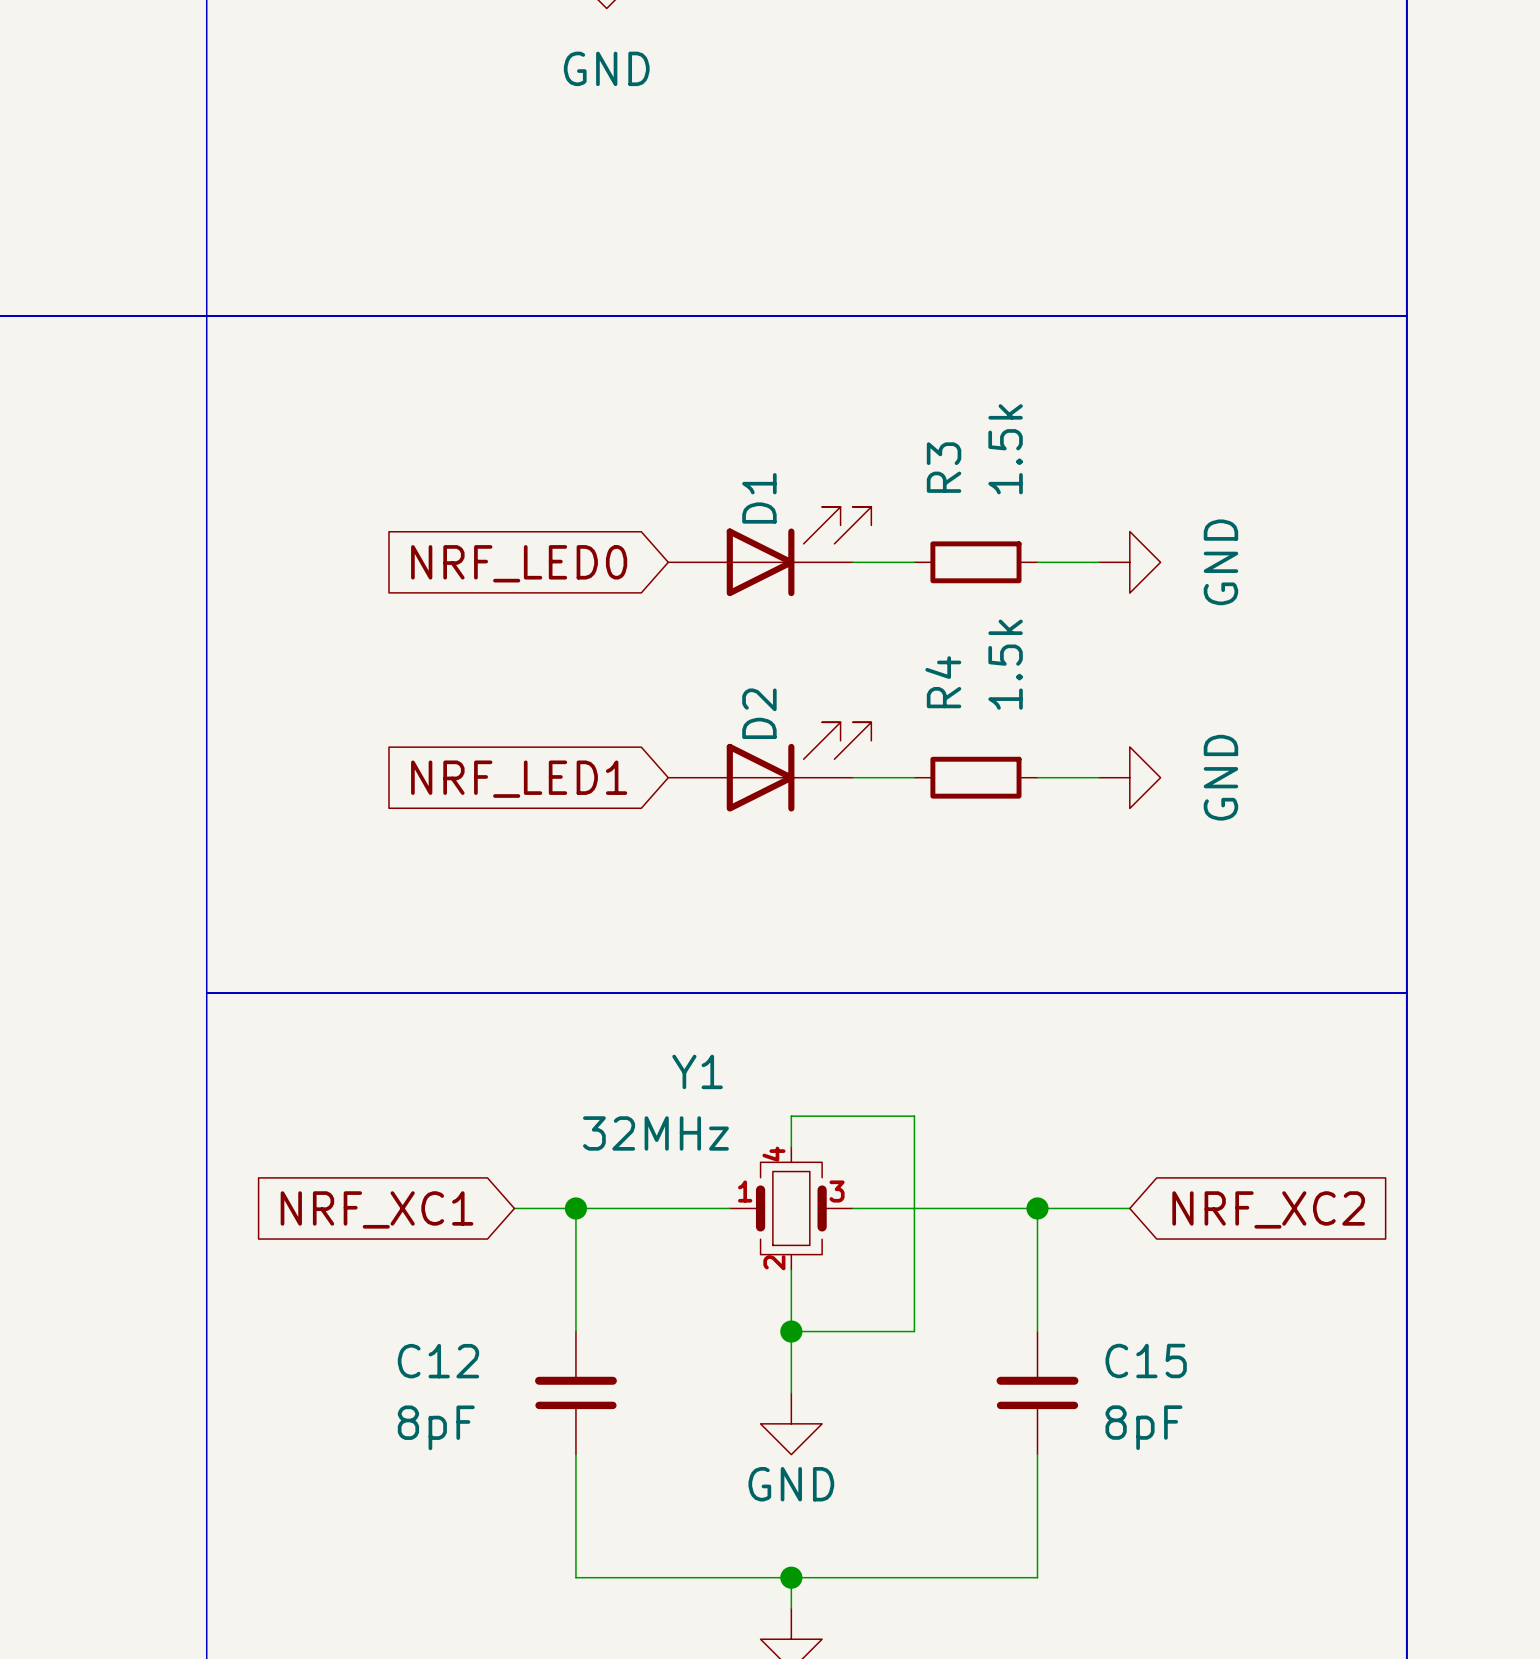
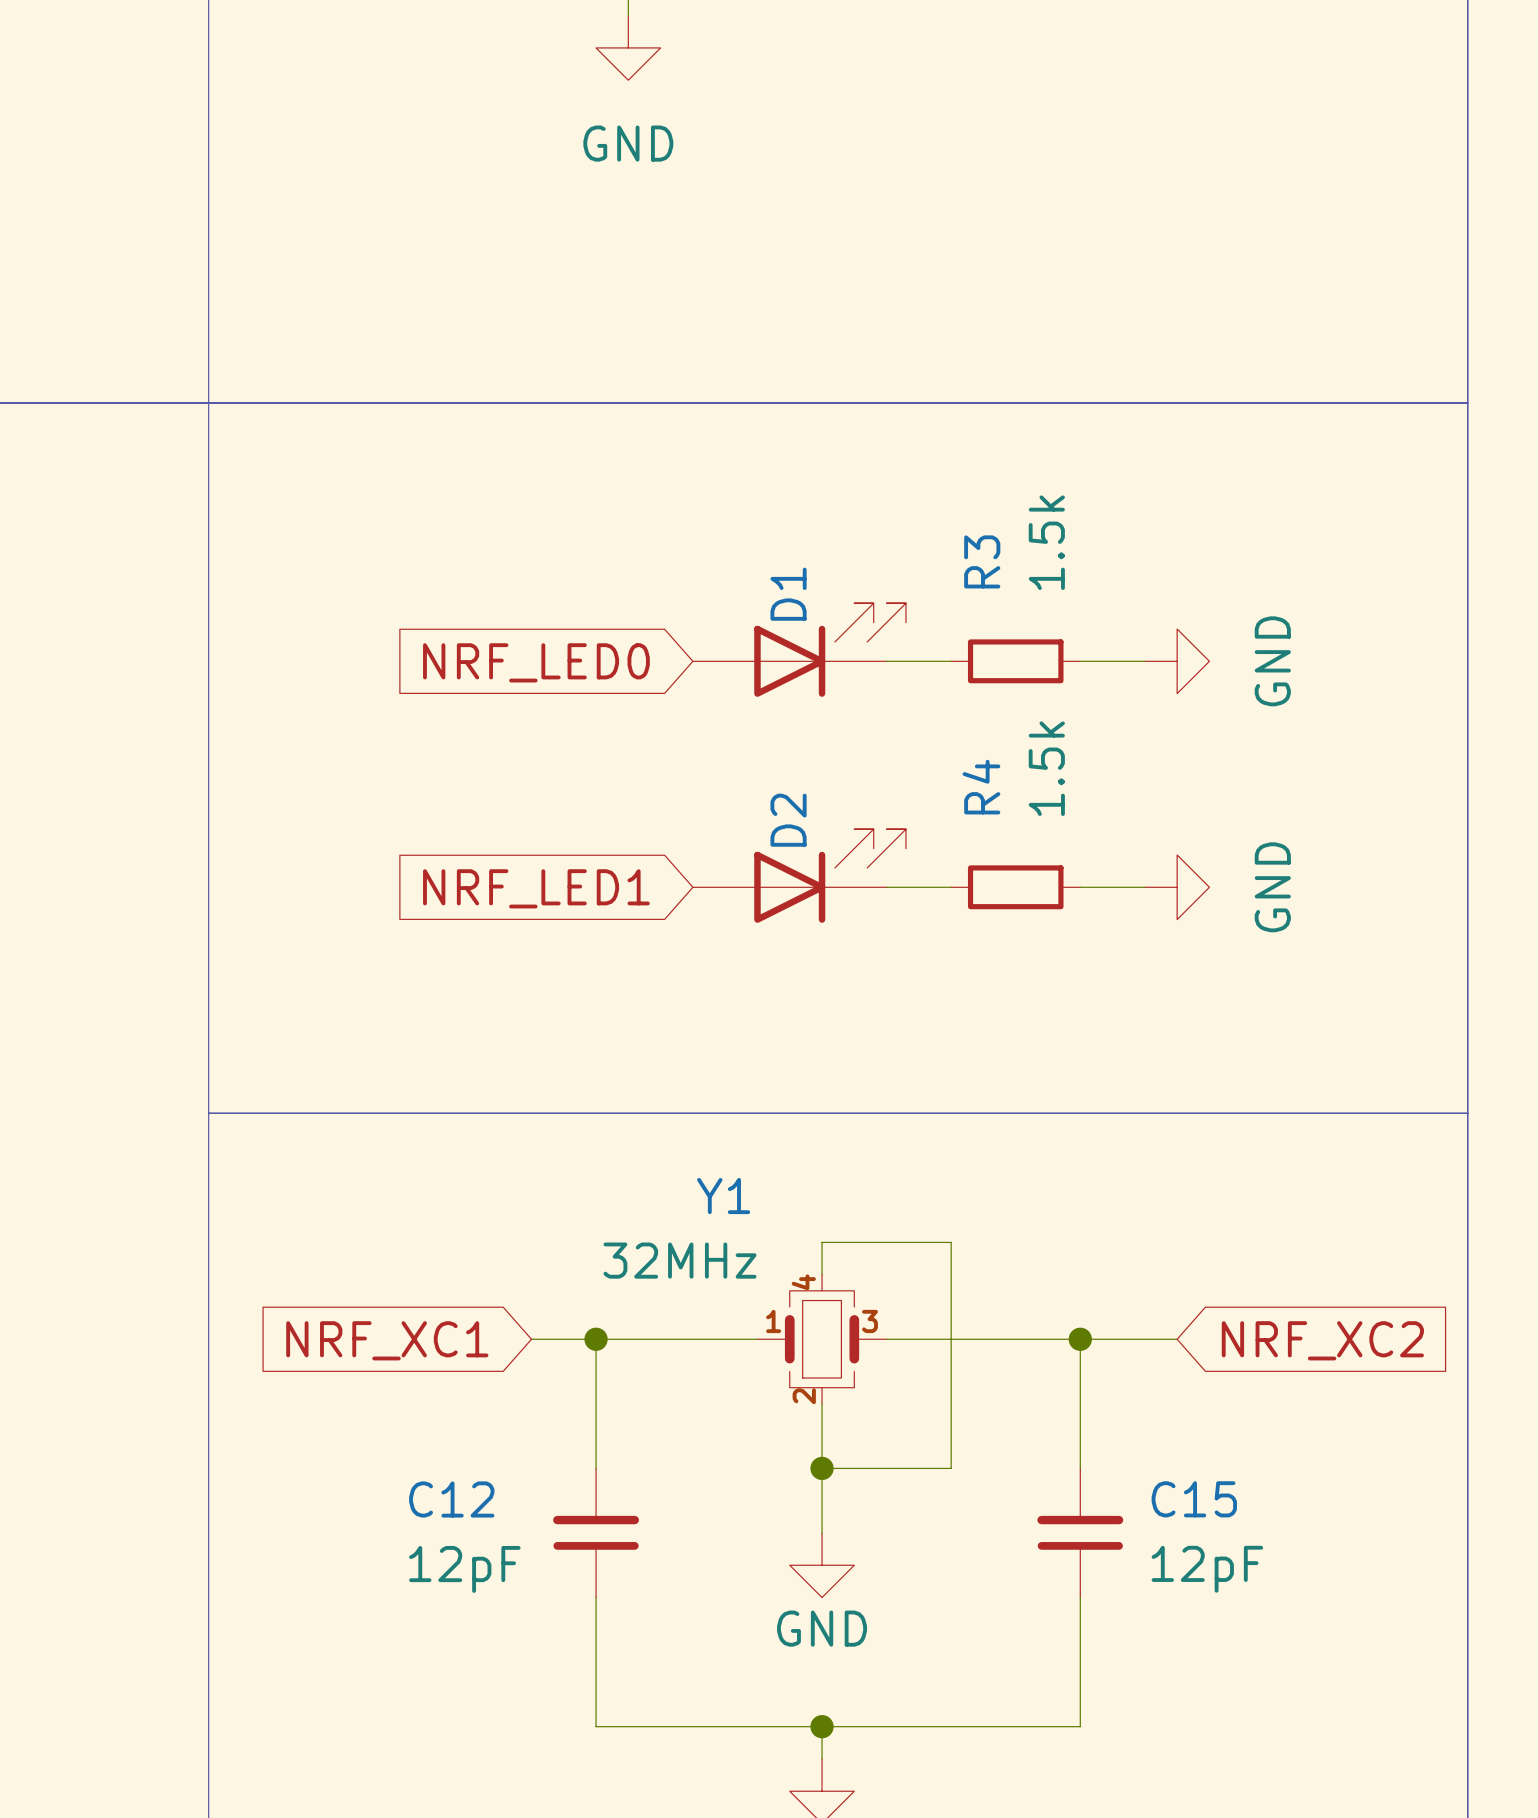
C12 value: 8pF (436, 1427) -> 12pF (464, 1569)
C15 value: 8pF (1143, 1427) -> 12pF (1207, 1569)

